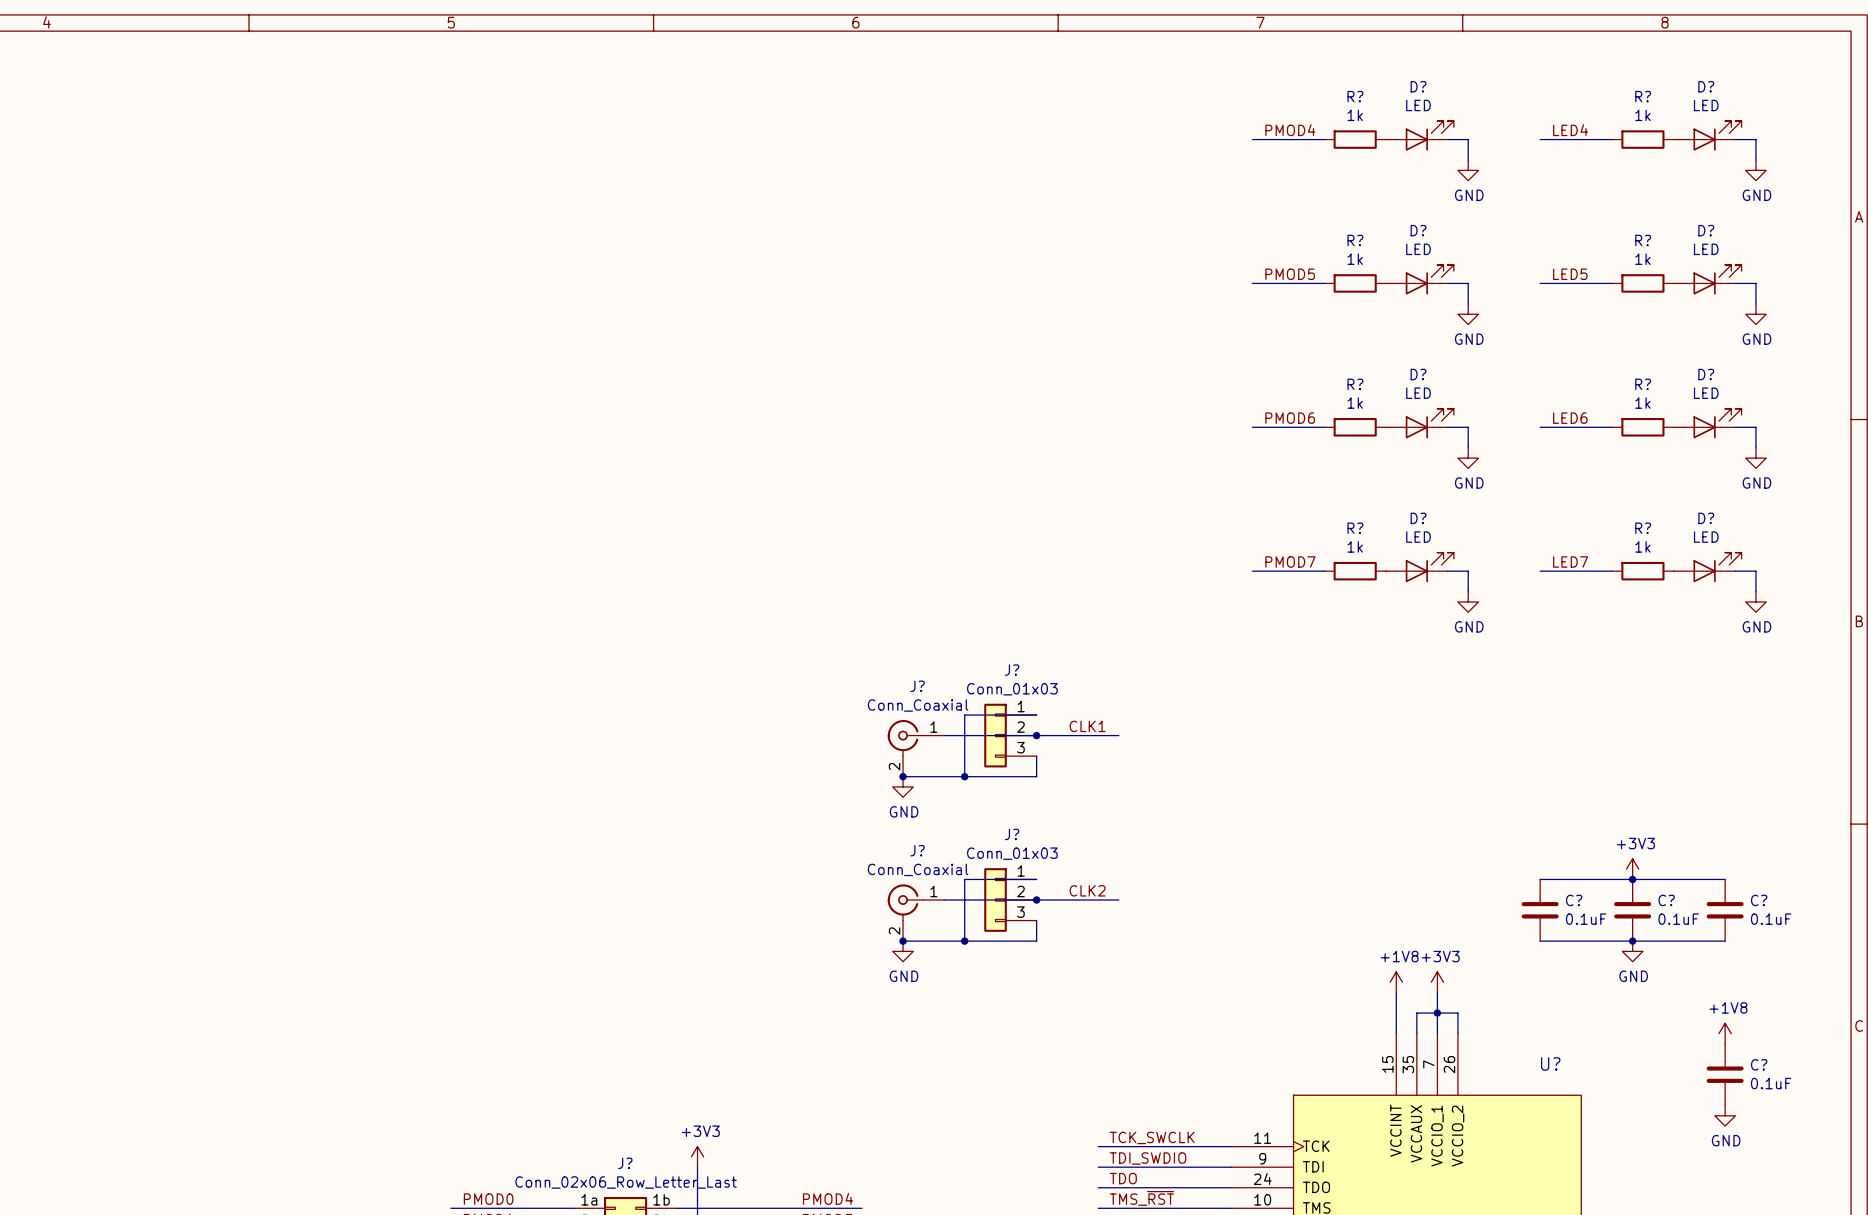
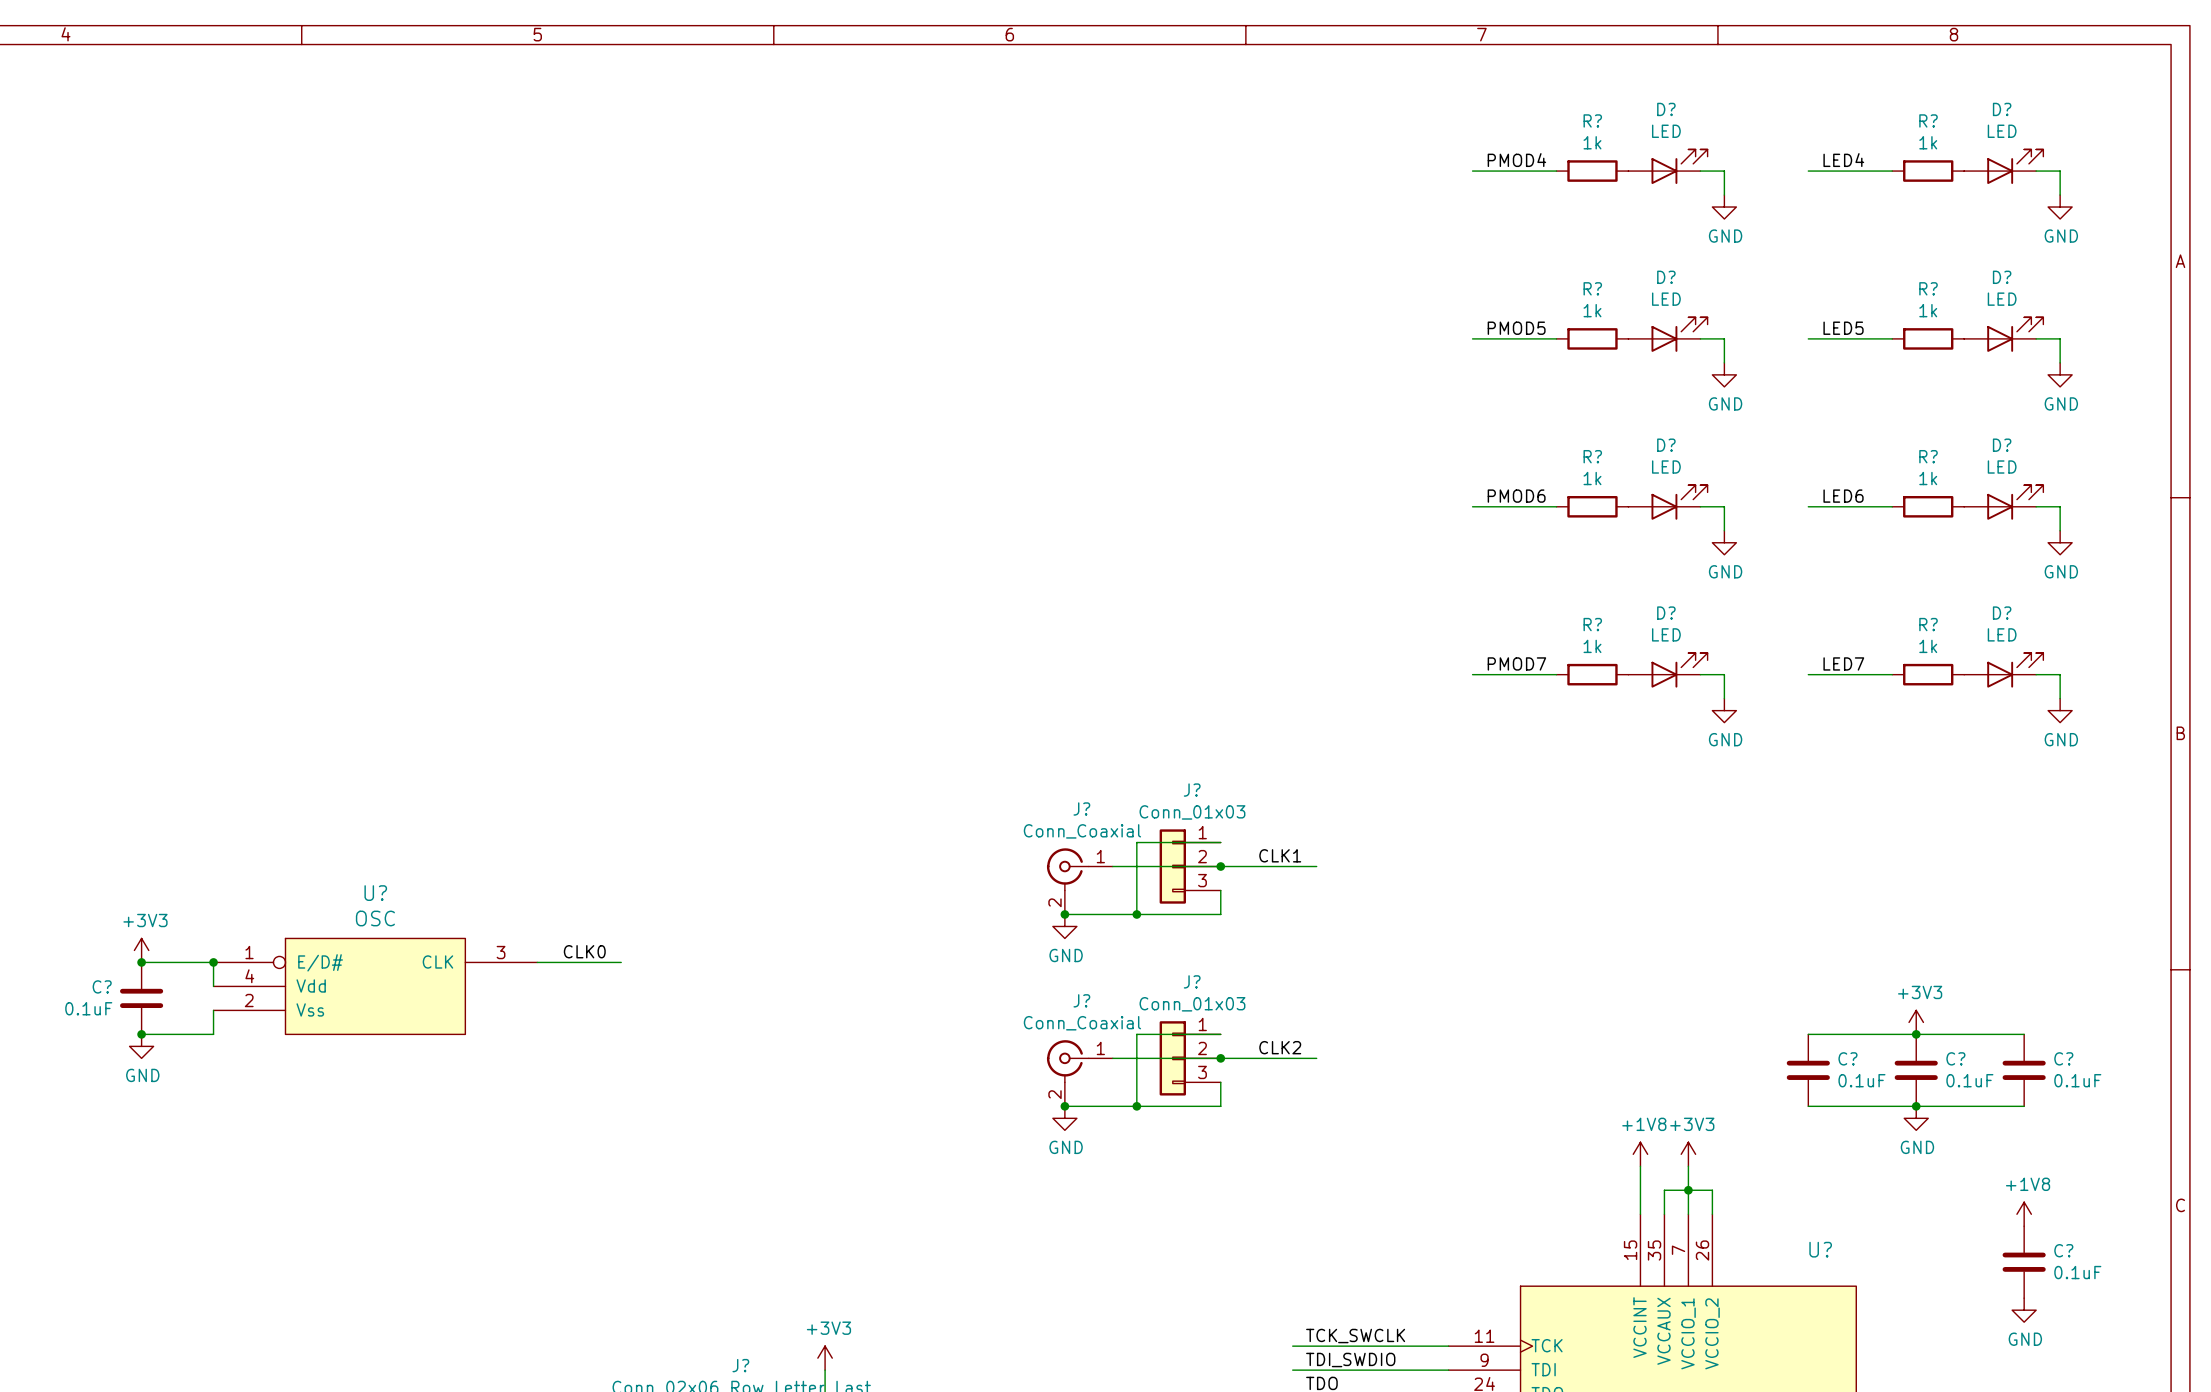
power symbol: none -> +3V3 (141, 950)
label: none -> CLK0 (584, 951)
wire: none -> (141, 962) (213, 962) (213, 986)
junction: none -> (141, 962)
junction: none -> (213, 962)
wire: none -> (537, 962) (621, 962)
U?: none -> OSC (375, 986)
C?: none -> 0.1uF (141, 998)
wire: none -> (213, 1010) (213, 1034) (141, 1034)
junction: none -> (141, 1034)
power symbol: none -> GND (141, 1046)

